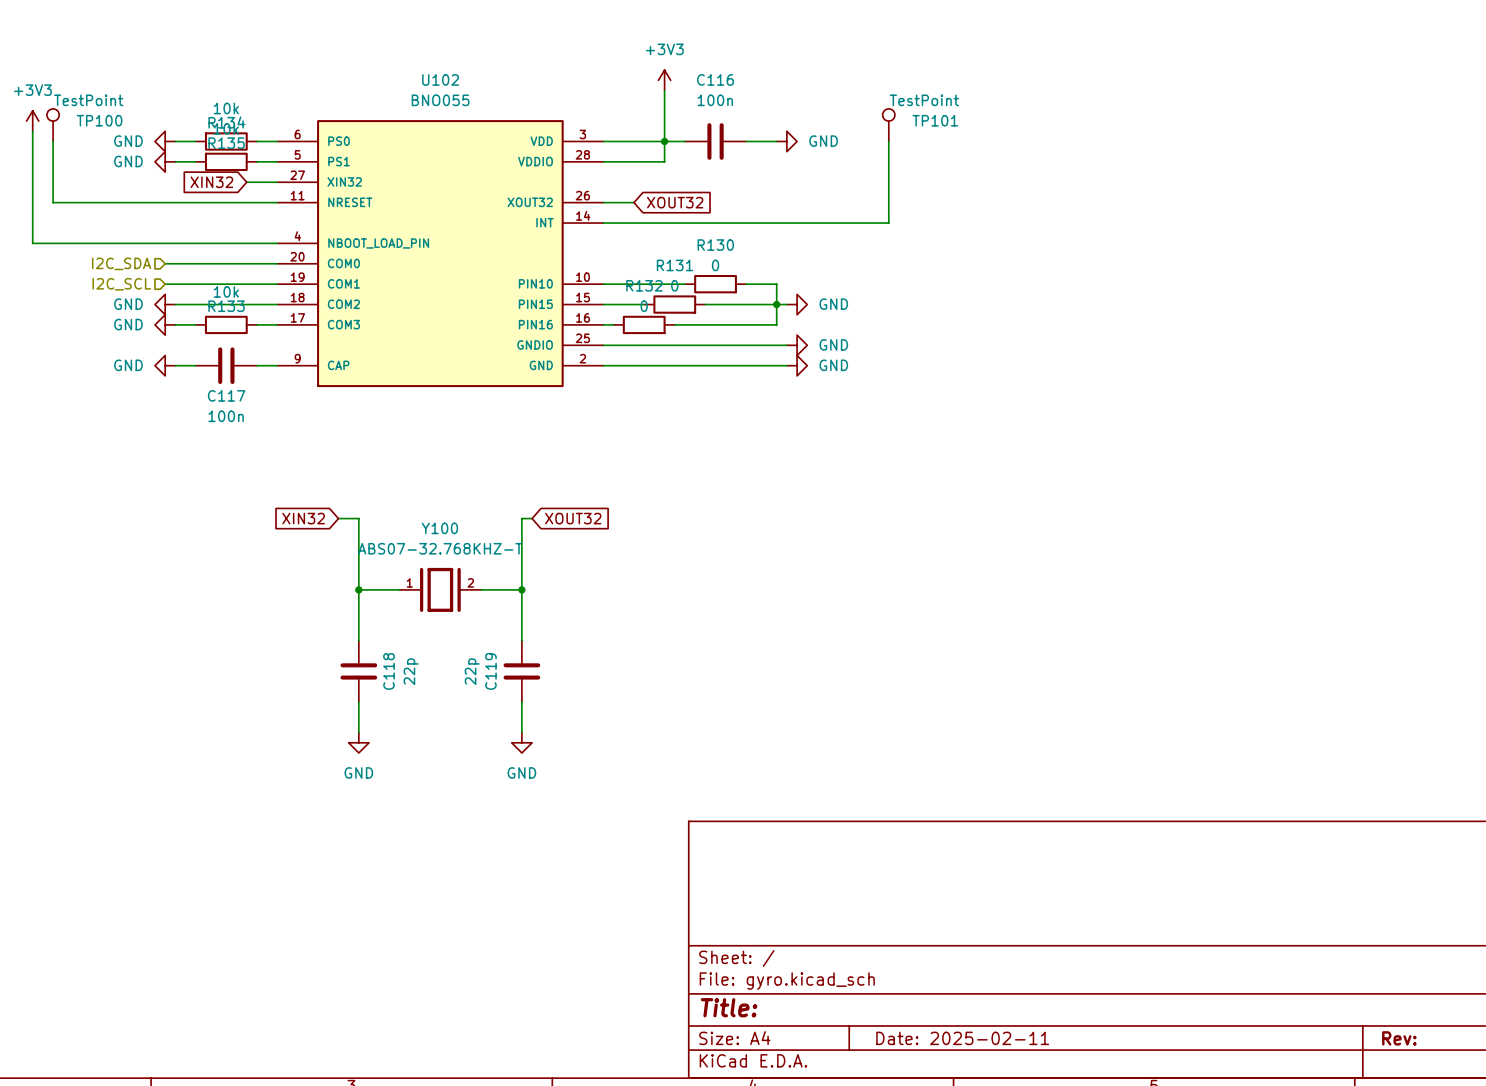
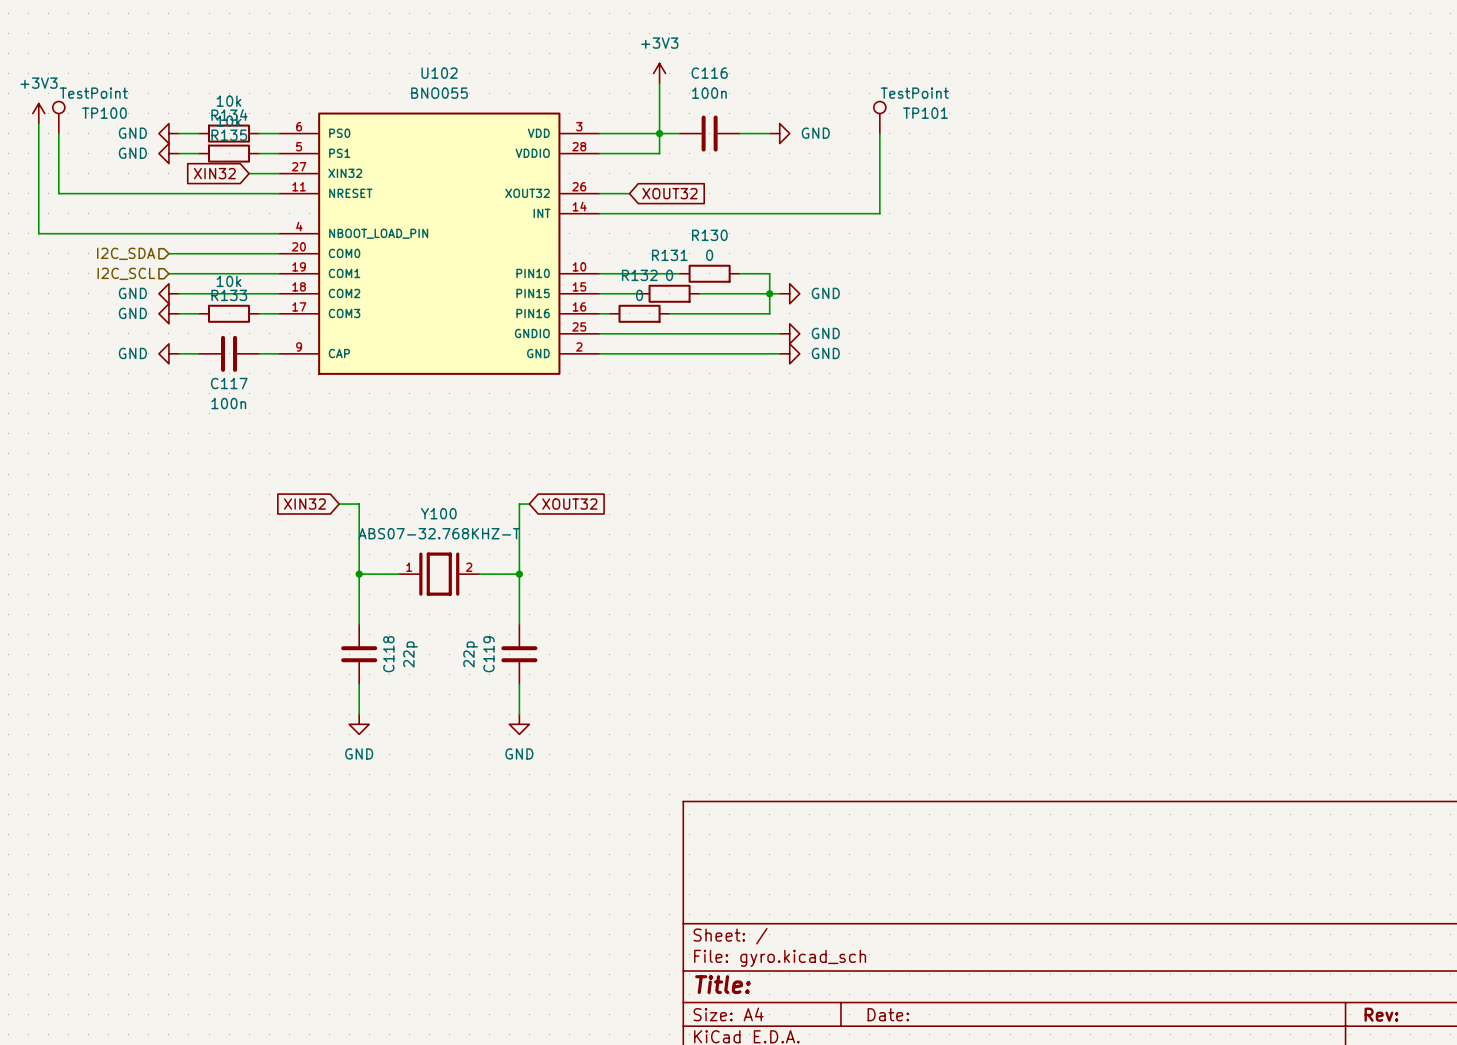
title block: Date: 2025-02-11 (962, 1038) -> Date: (888, 1014)

